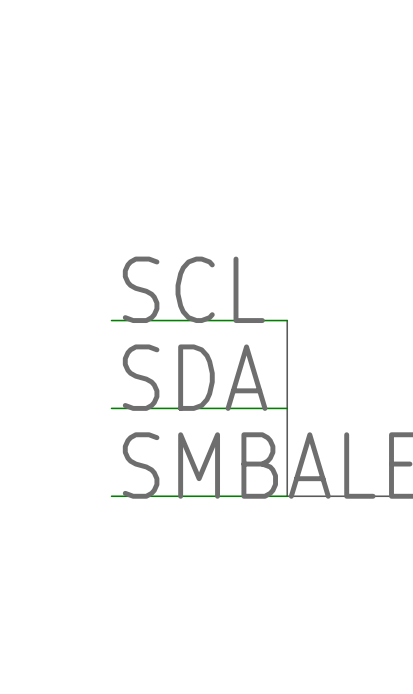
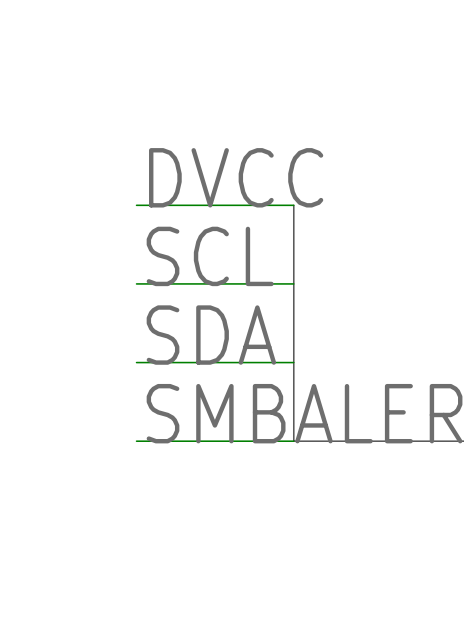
label: none -> DVCC (236, 177)
wire: none -> (136, 205) (293, 205)
bus: none -> (293, 205) (293, 283)

